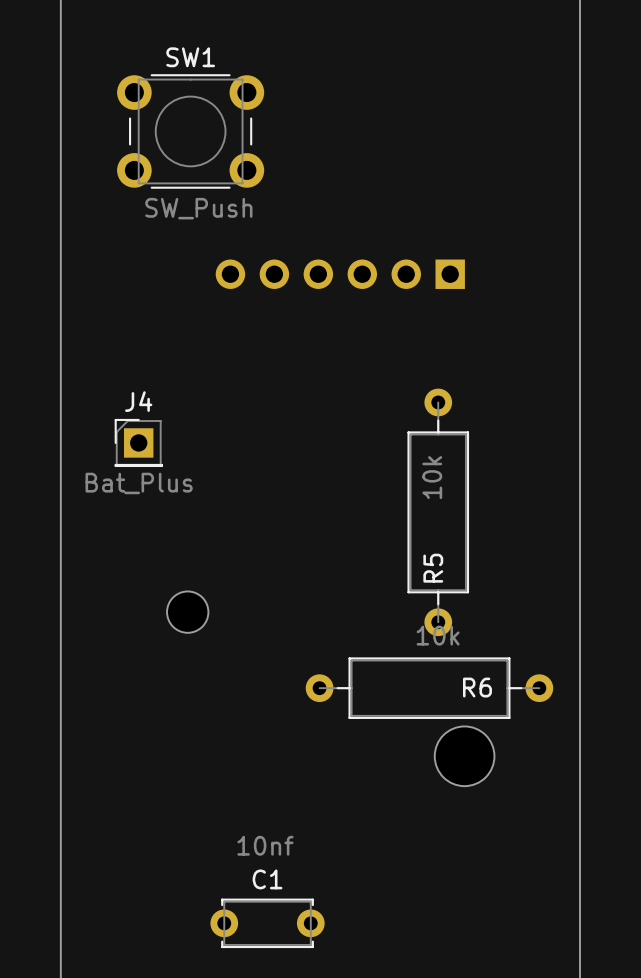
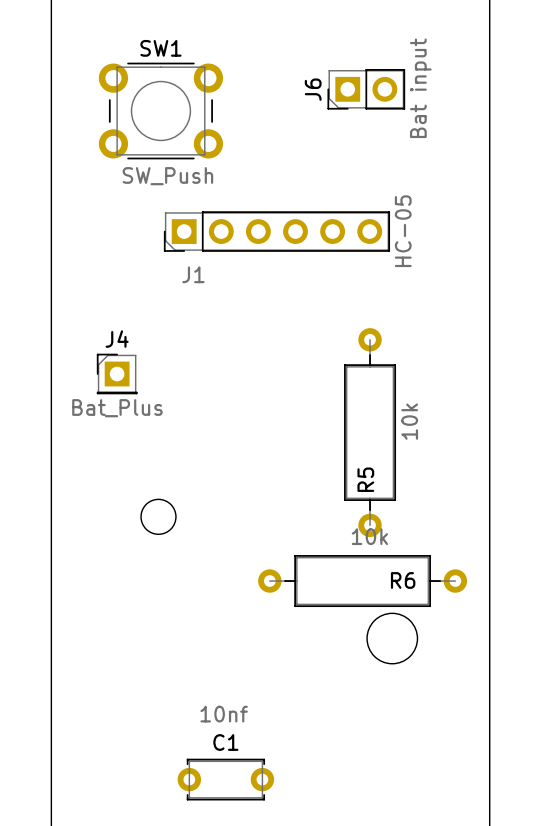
J6: none -> Bat input (366, 89)
J1 side: bottom (340, 274) -> top (276, 231)
R5 value position: 10k (432, 477) -> 10k (409, 421)

